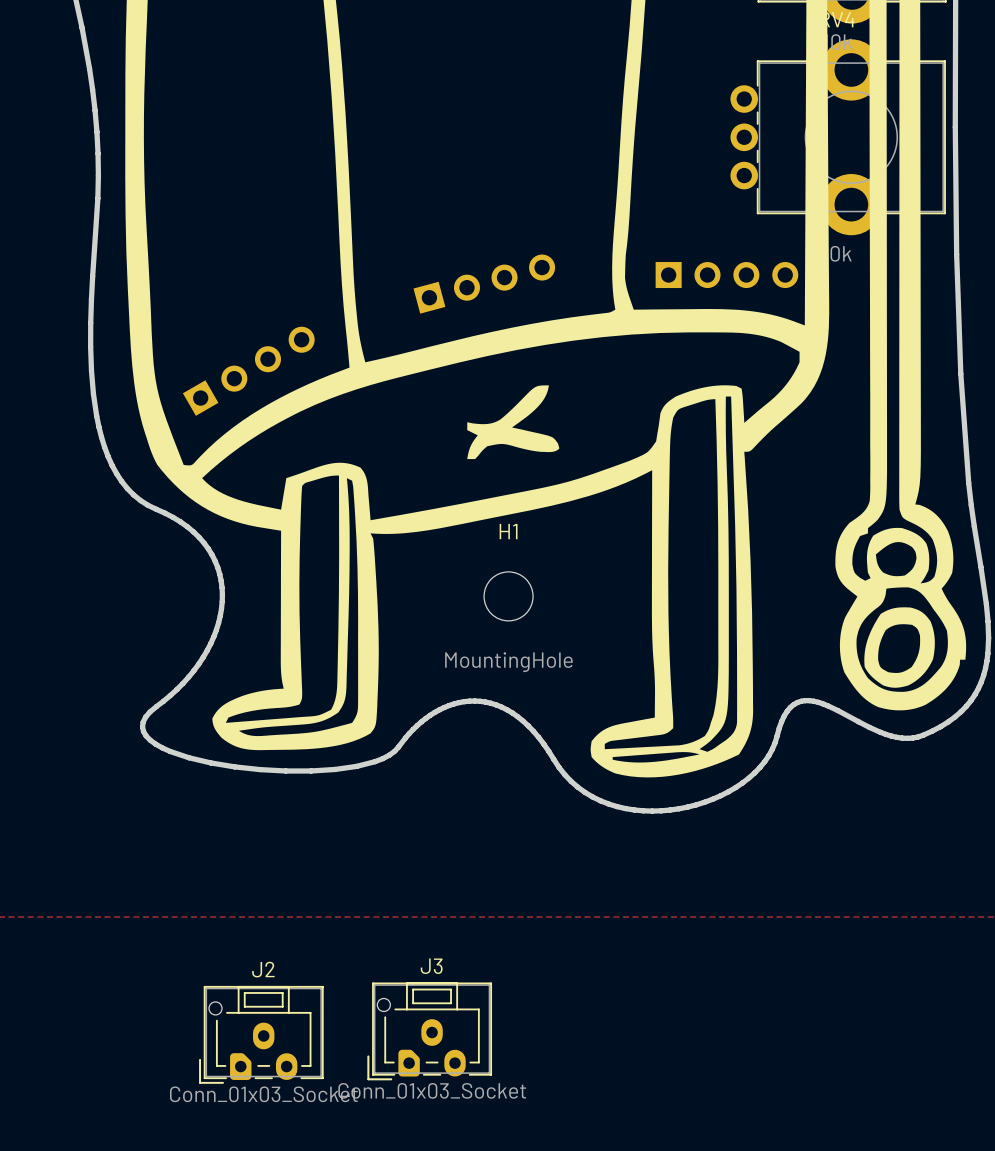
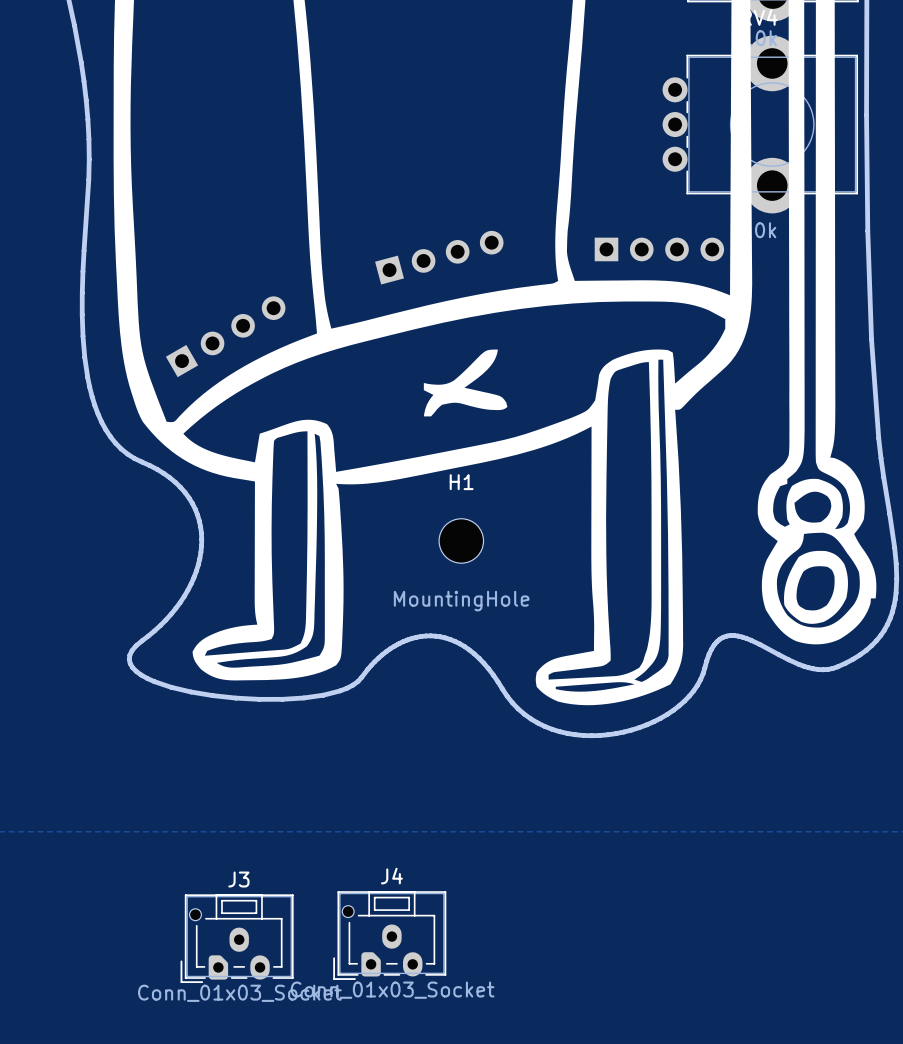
J3 name: J3 (431, 966) -> J4 (391, 876)
J2 name: J2 (263, 969) -> J3 (238, 879)

